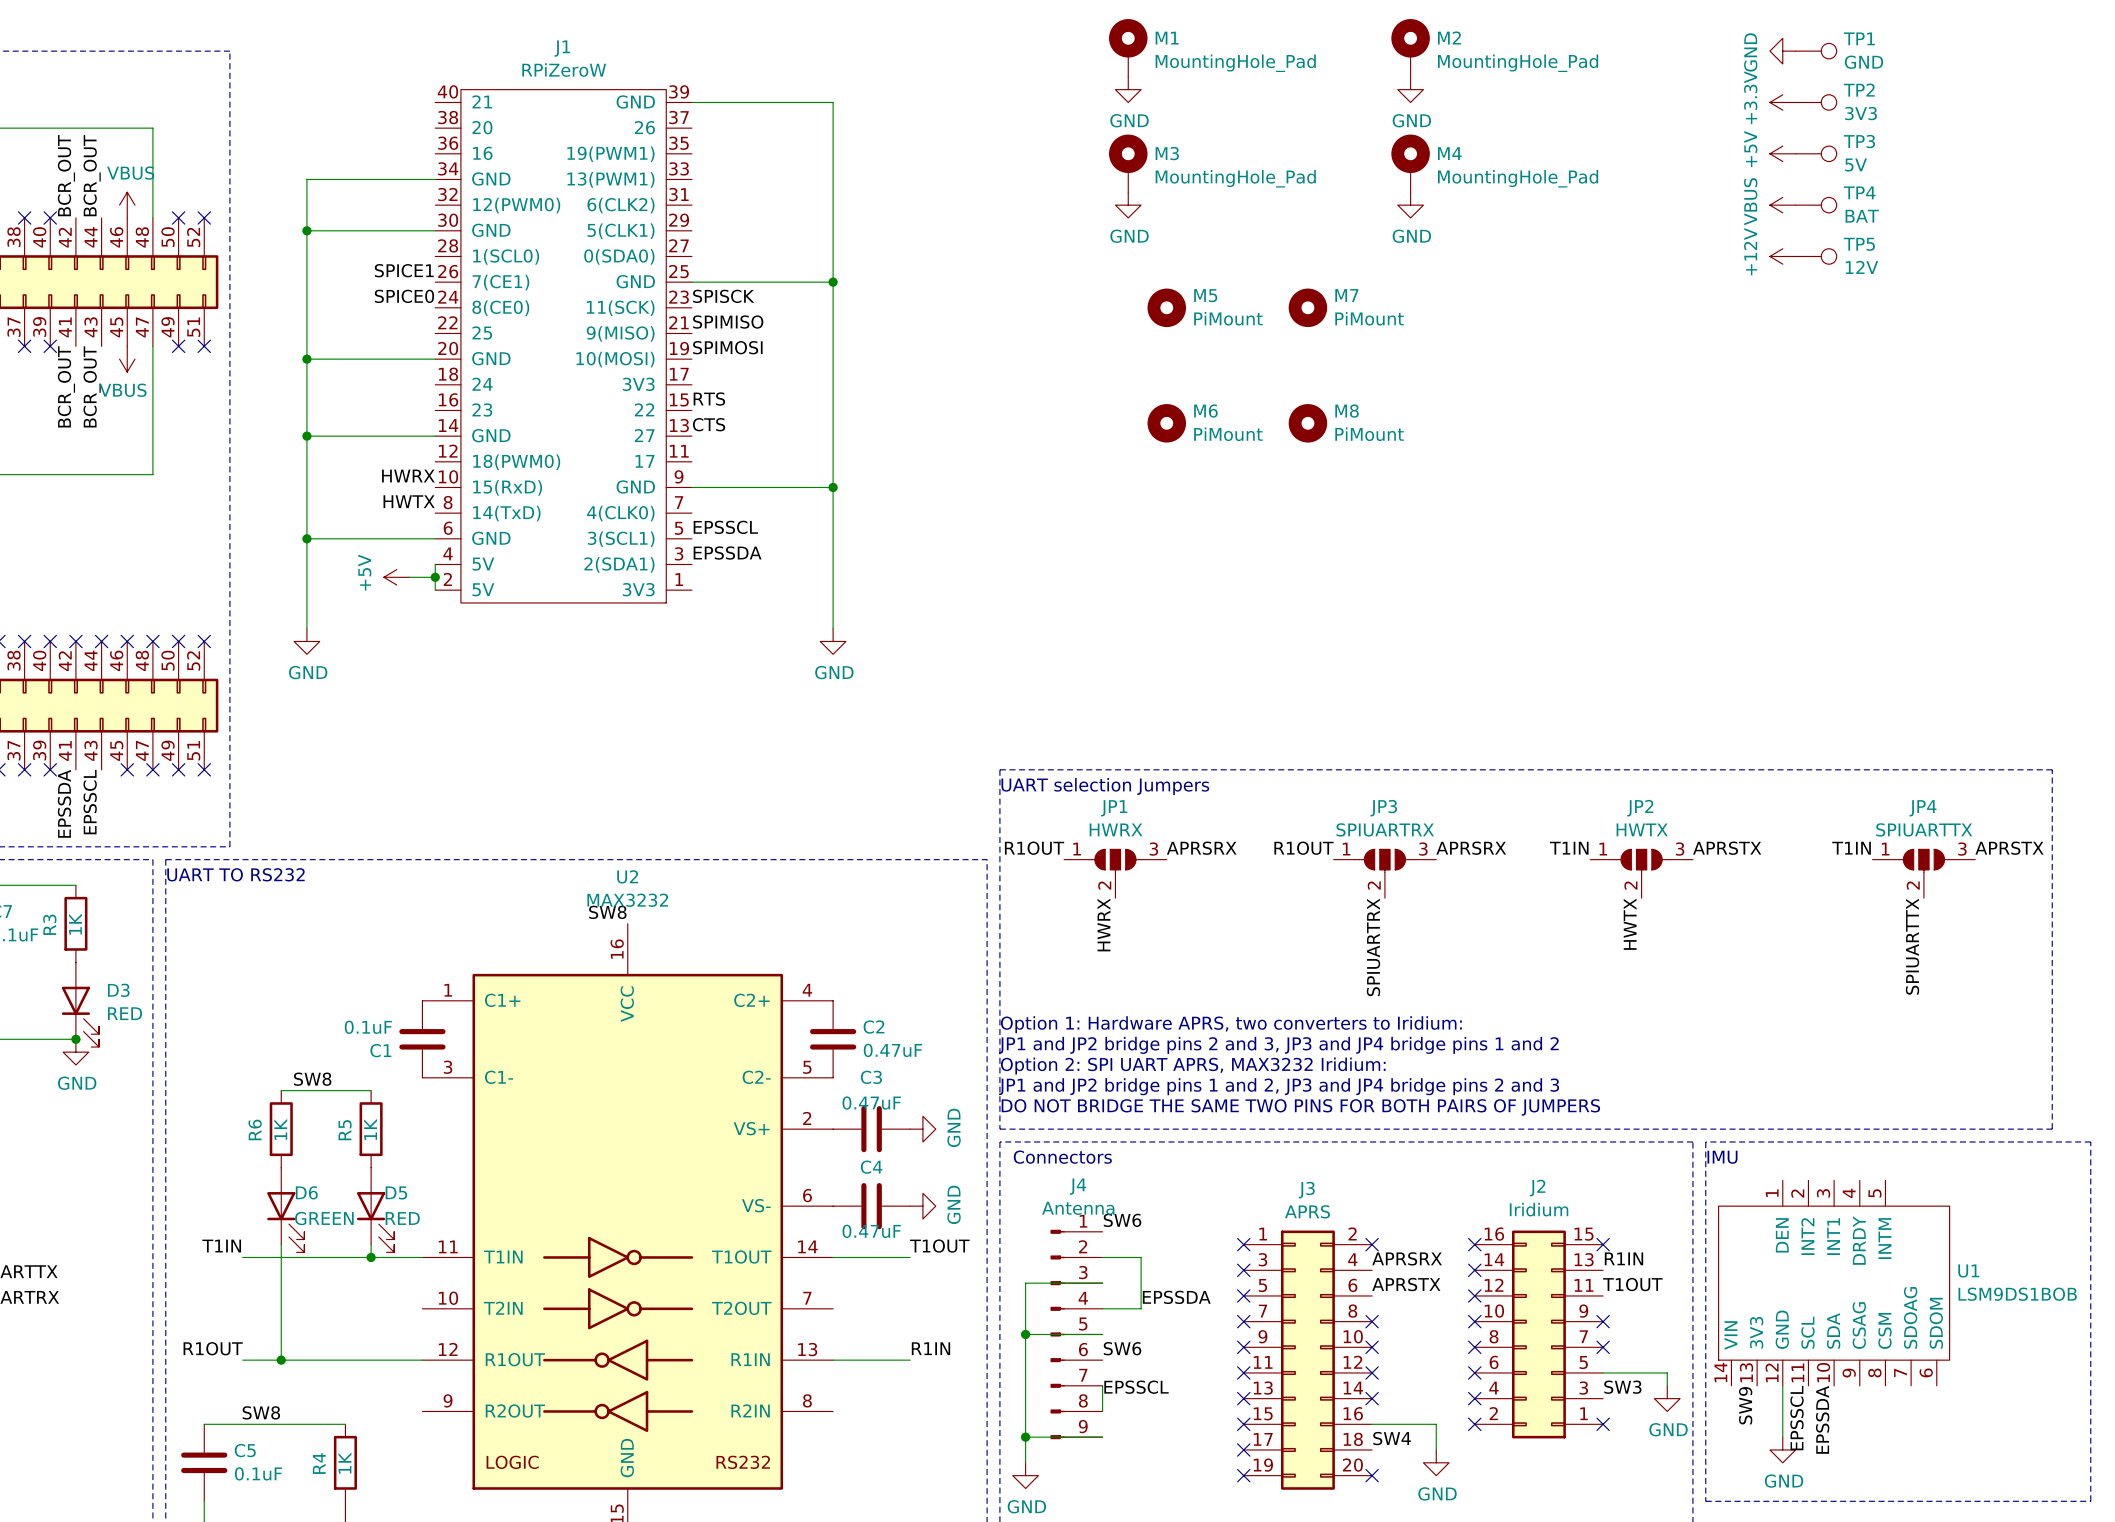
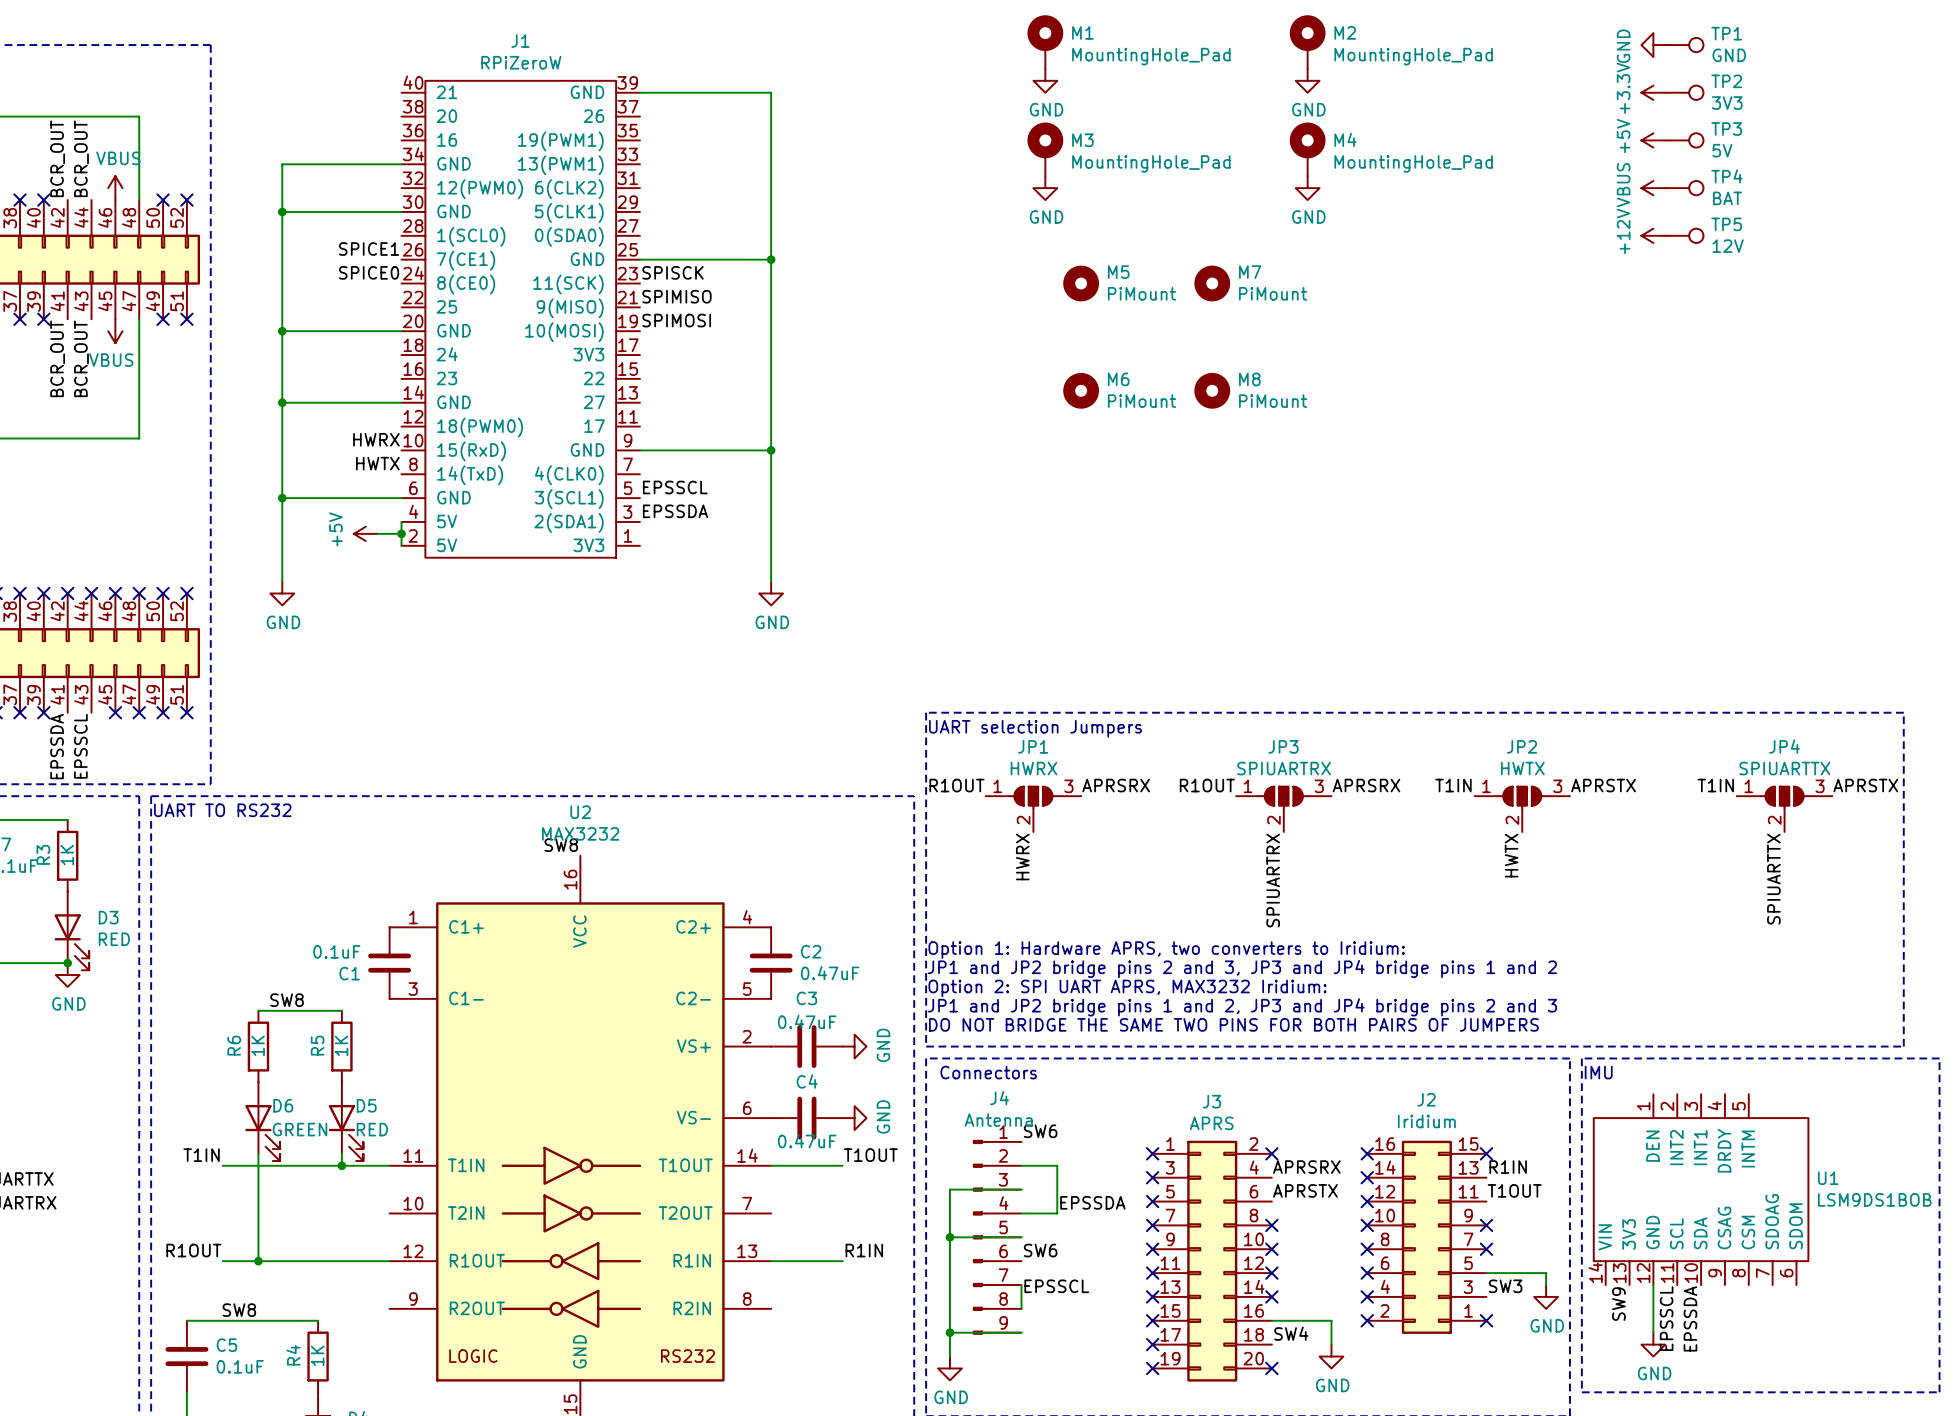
label: RTS (709, 399) -> none
label: CTS (709, 424) -> none

